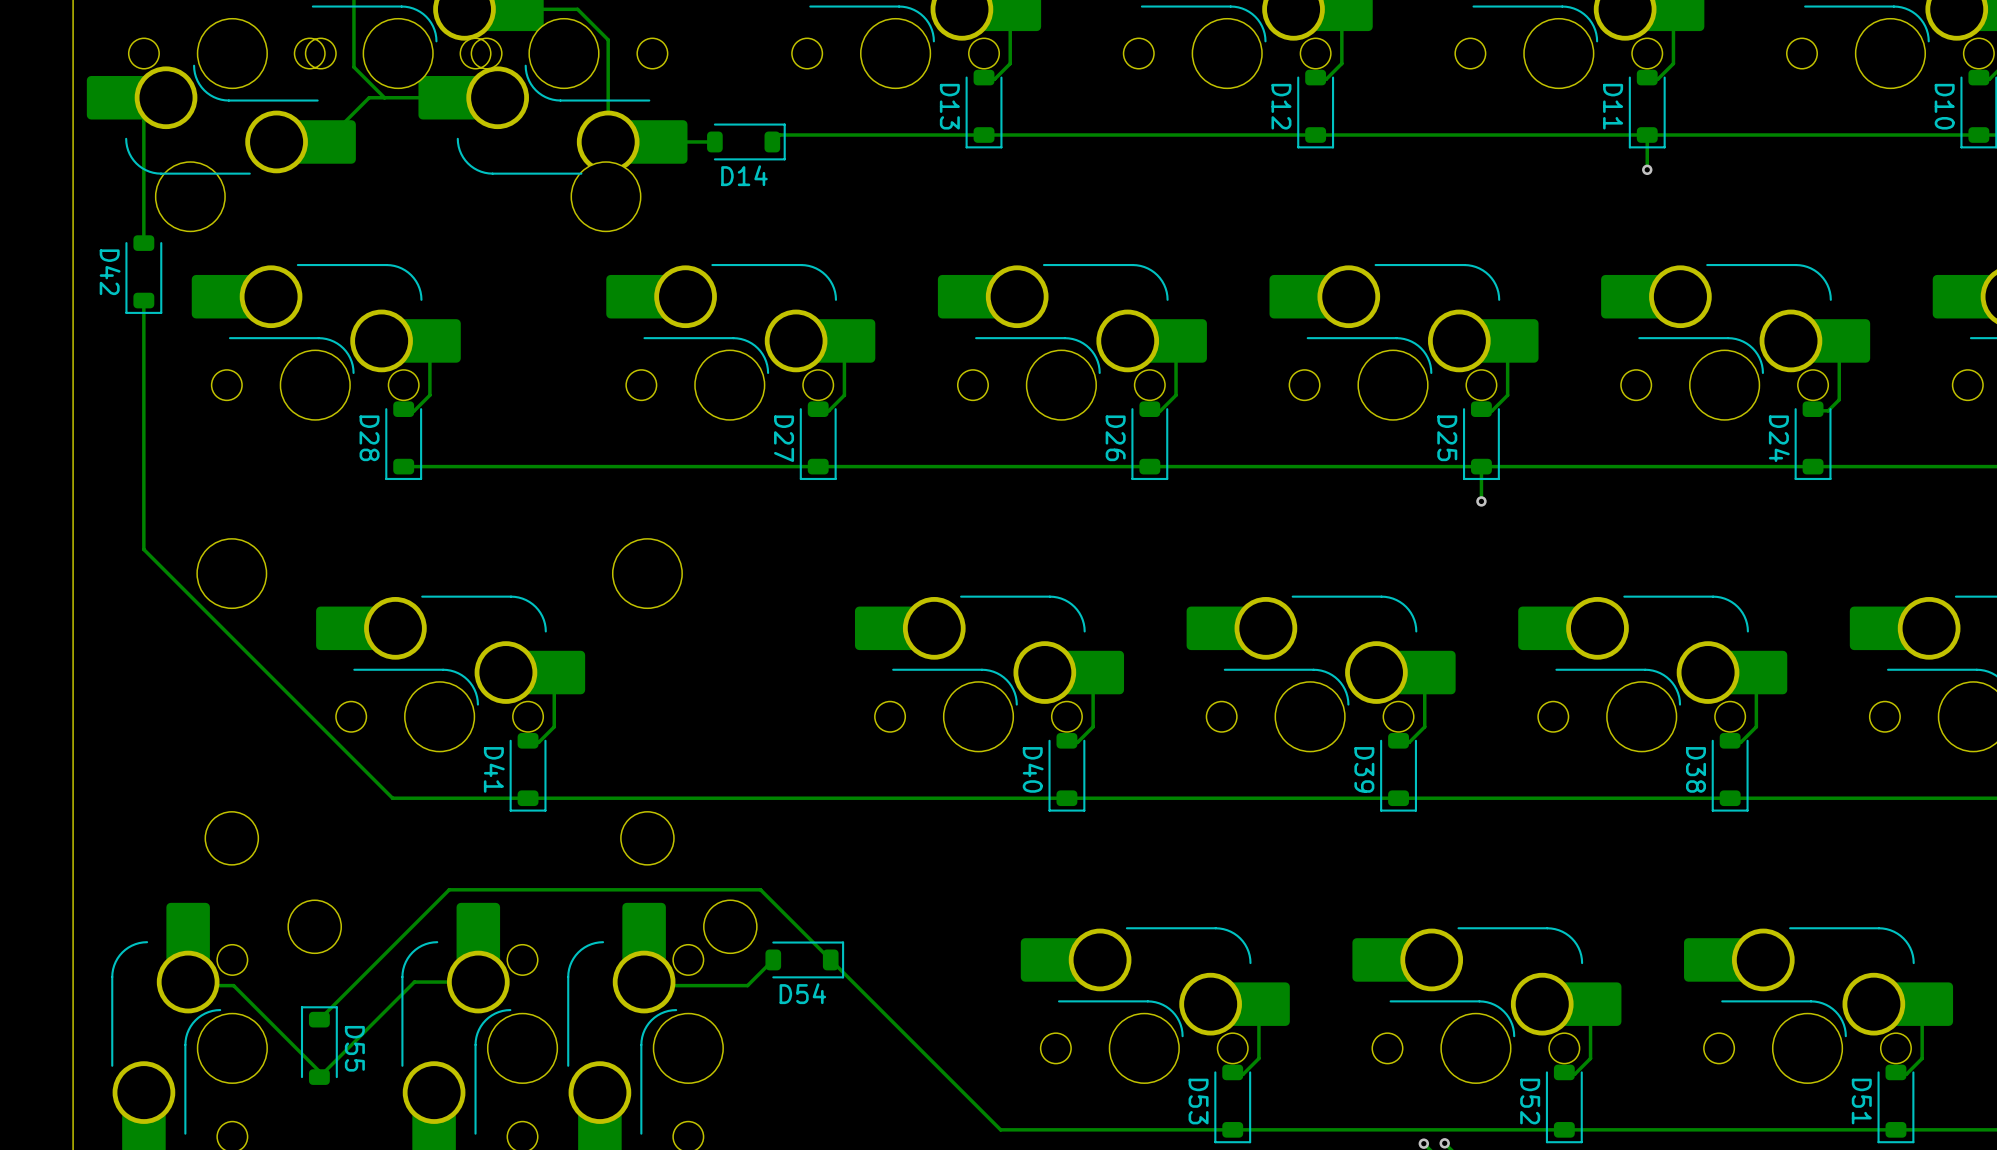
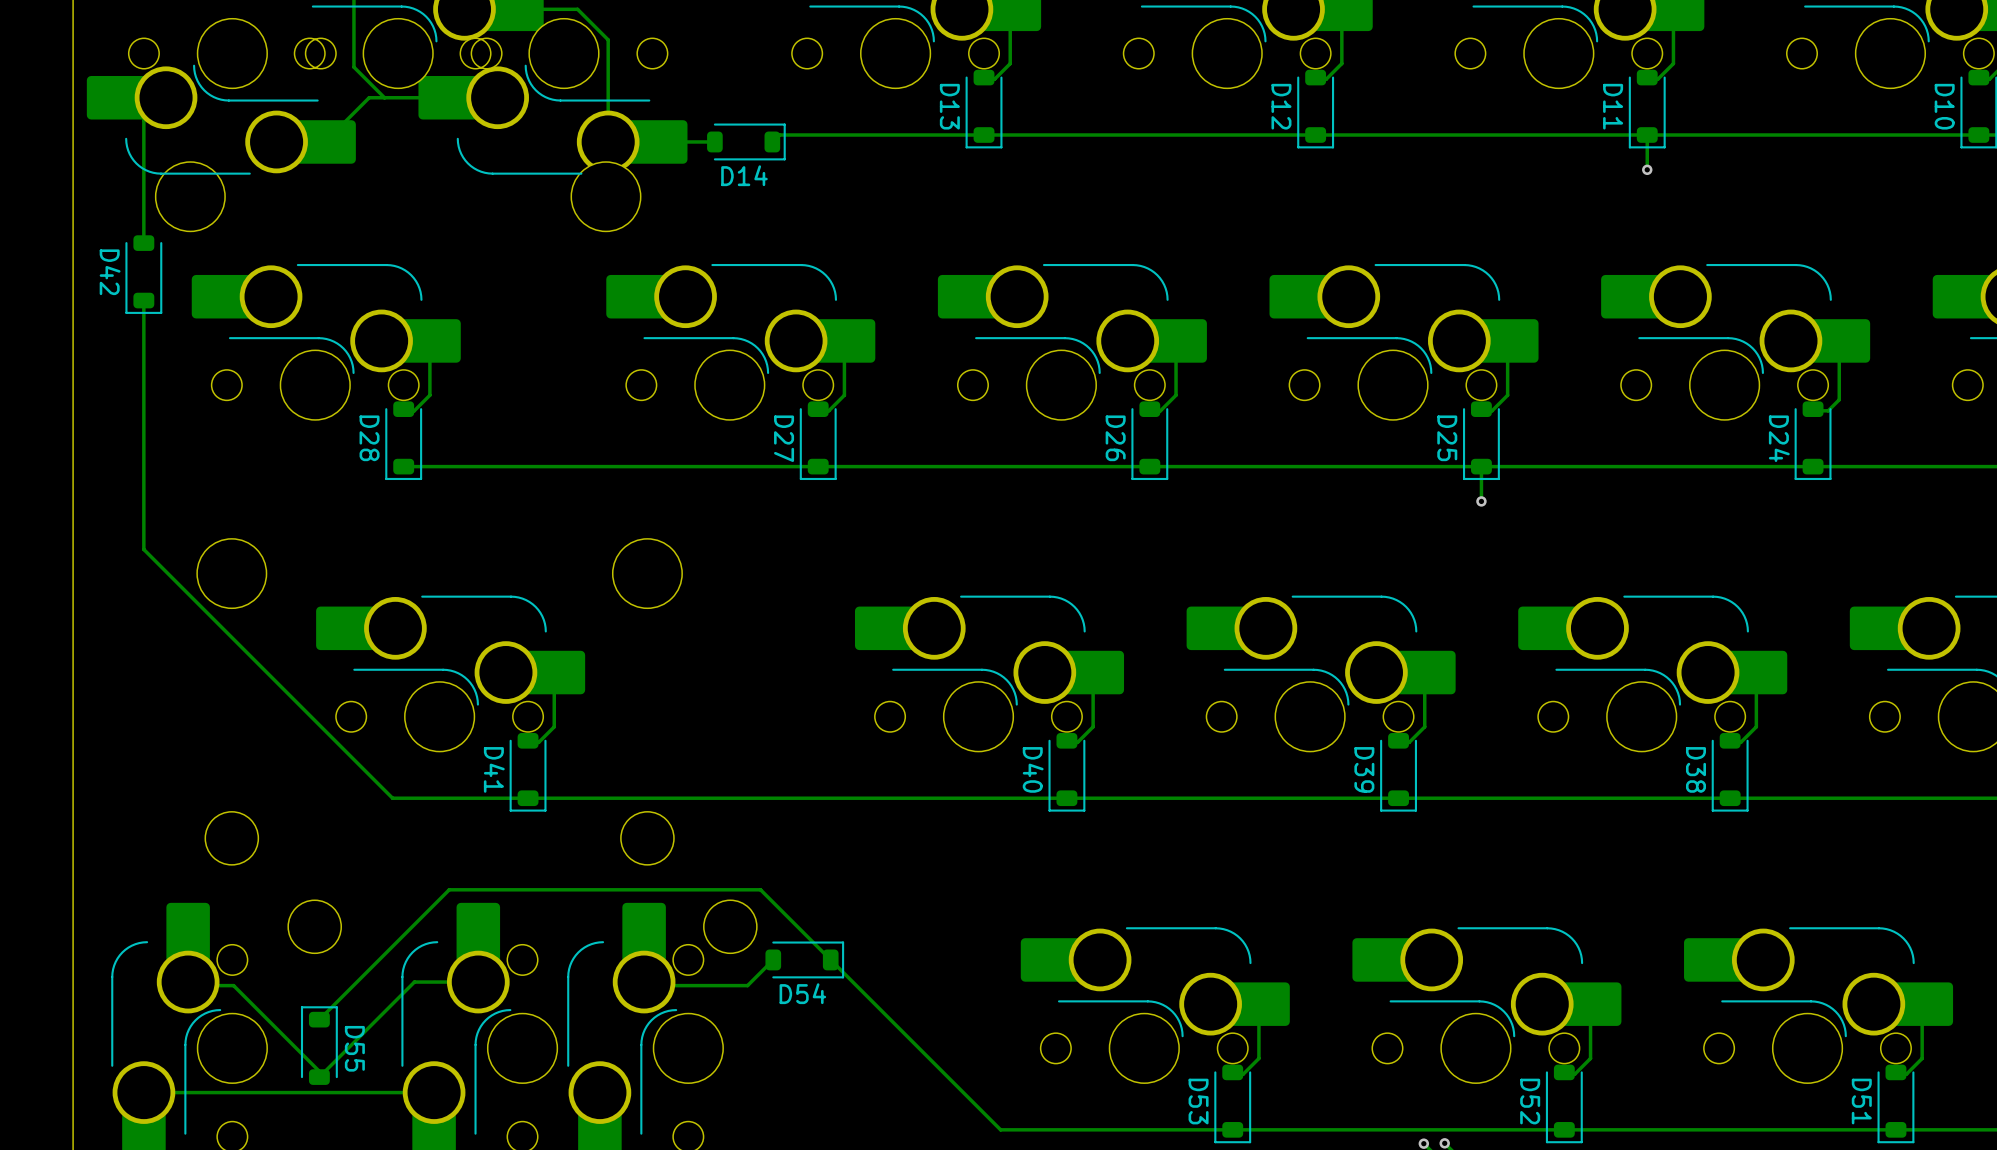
track: none -> (434, 1092) (143, 1092)

